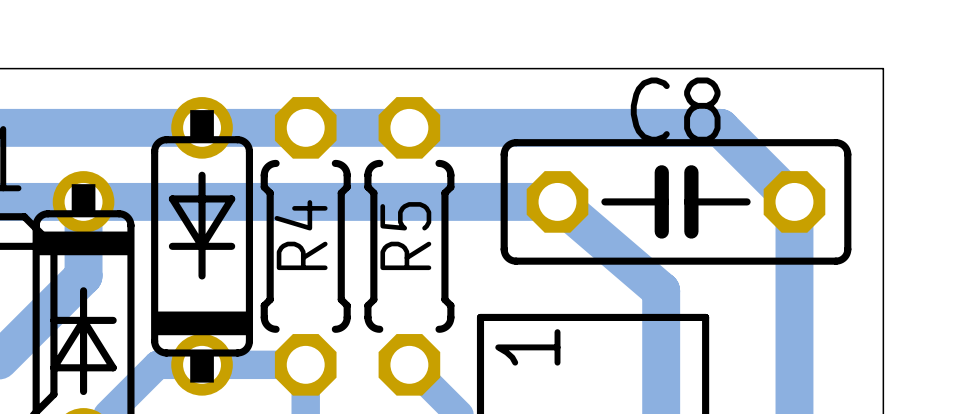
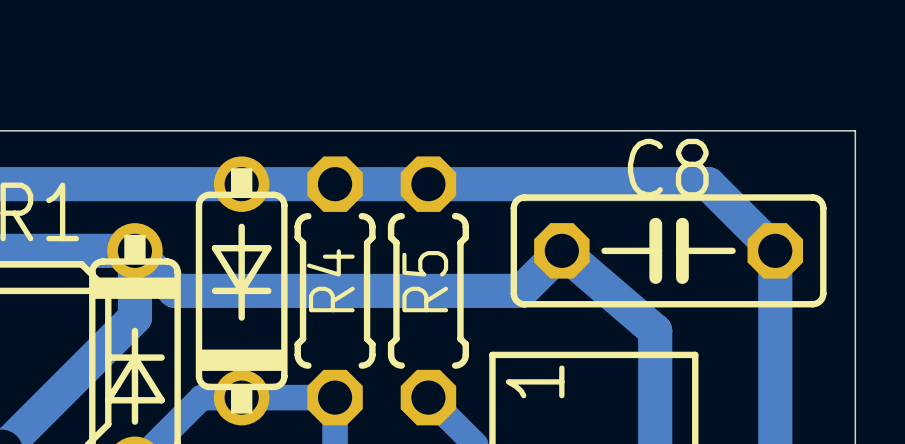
bottom track: (83, 201) (557, 201) -> (134, 250) (174, 290) (521, 290) (561, 250)

